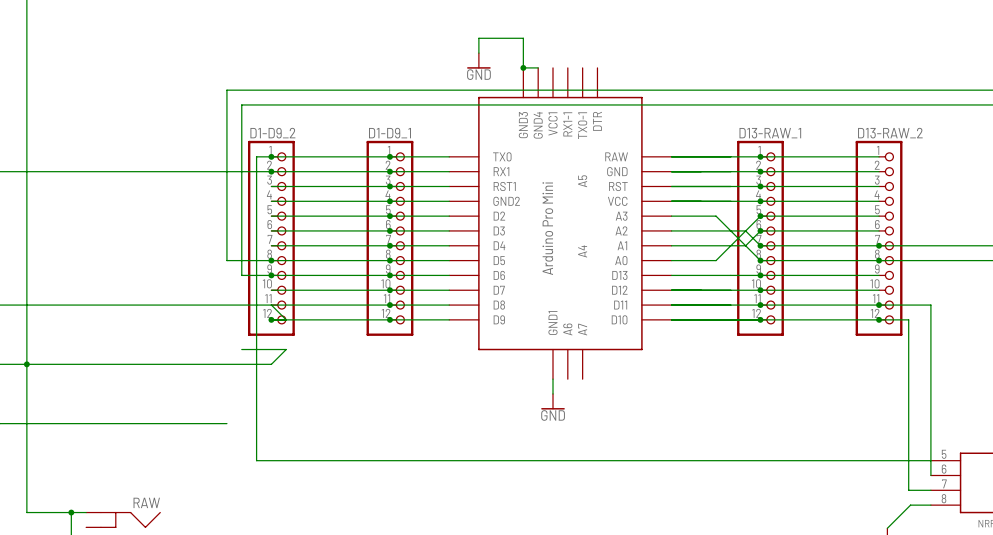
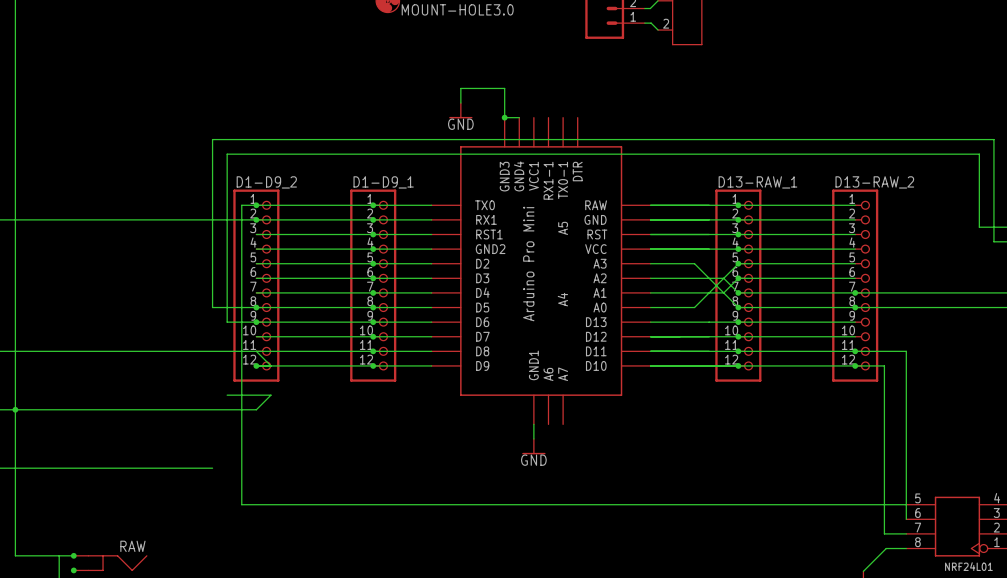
junction: (71, 512) -> none
junction: none -> (73, 555)
junction: none -> (73, 570)

